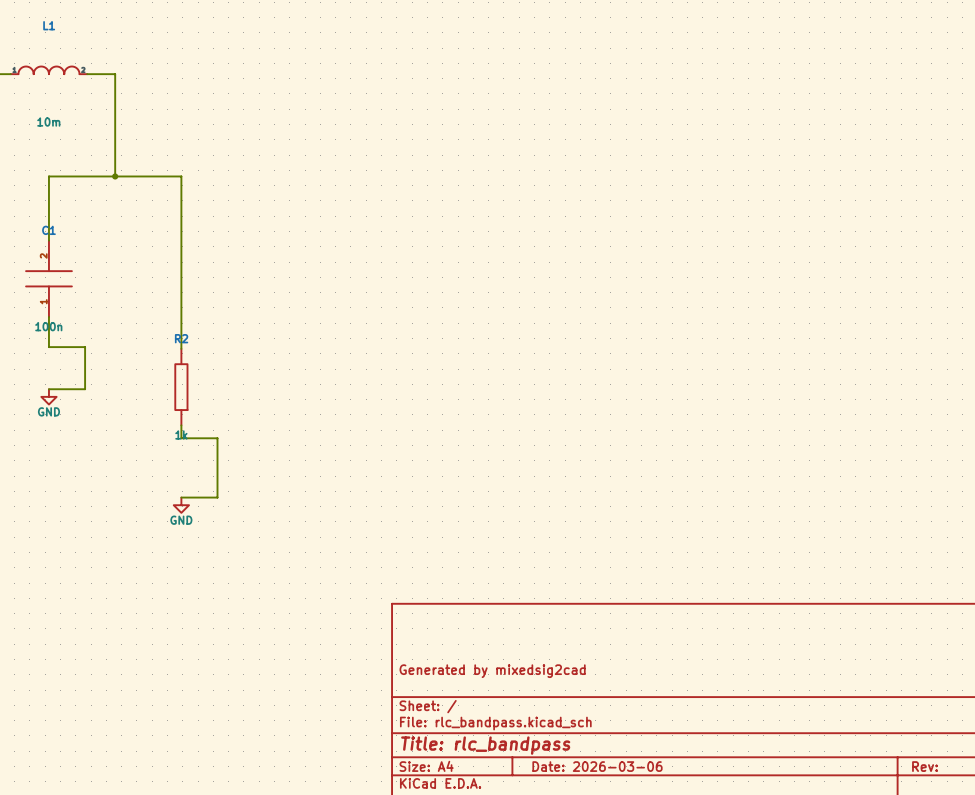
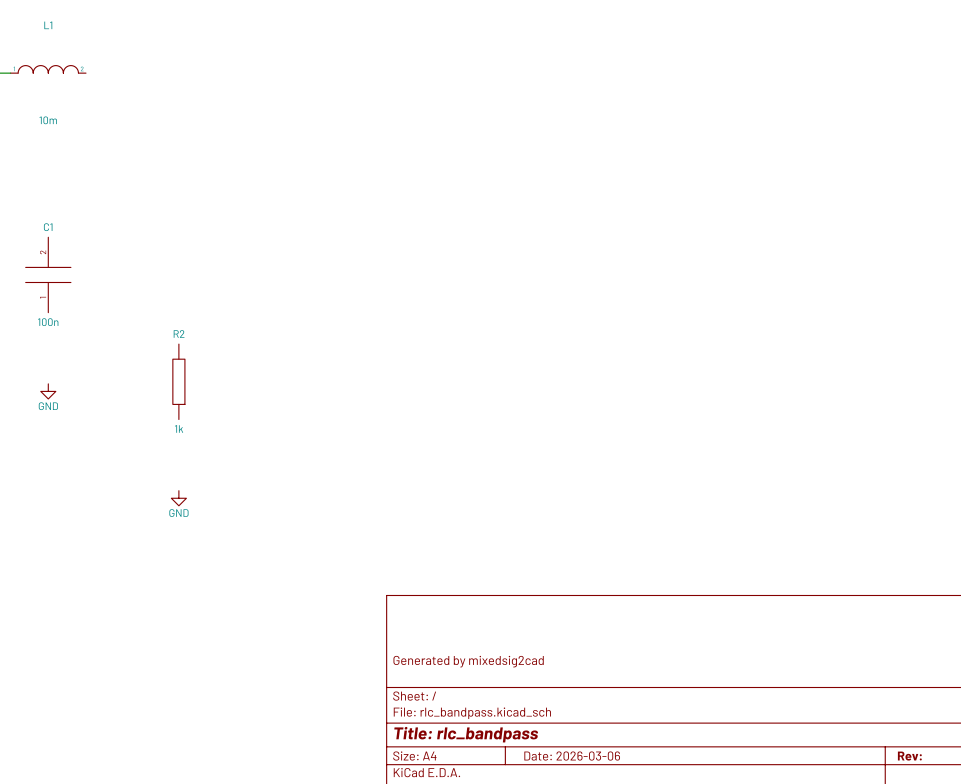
wire: (87, 74) (115, 74) (115, 176) -> none
junction: (115, 176) -> none
wire: (48, 240) (48, 176) (181, 176) (181, 348) -> none
wire: (48, 317) (48, 347) (85, 347) (85, 389) (48, 389) -> none
wire: (181, 425) (181, 438) (217, 438) (217, 497) (181, 497) -> none

